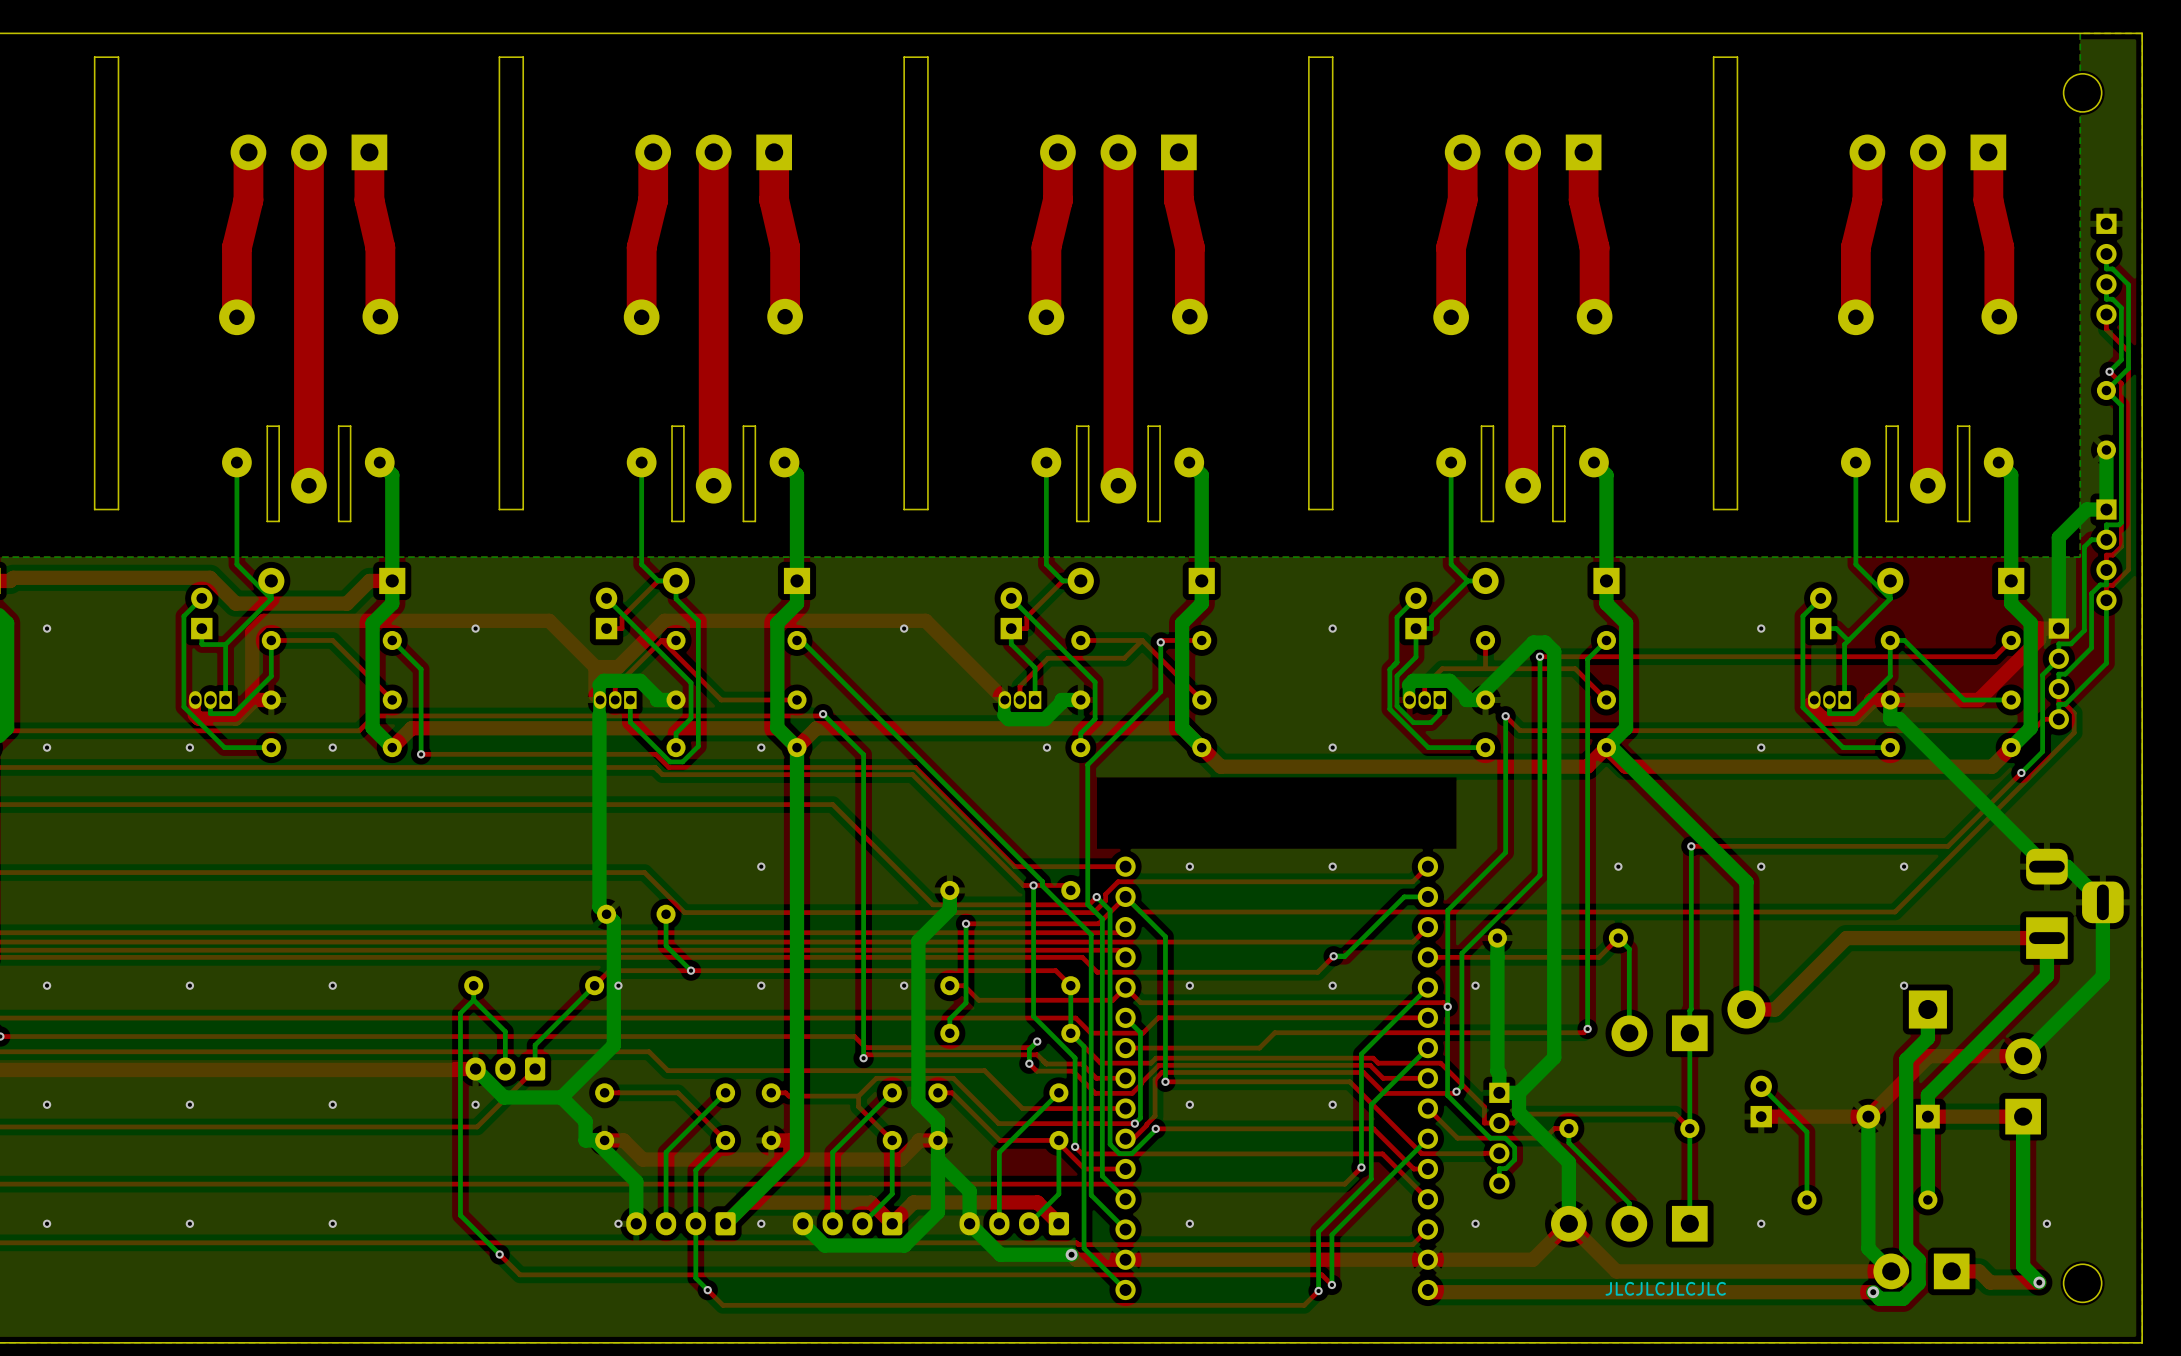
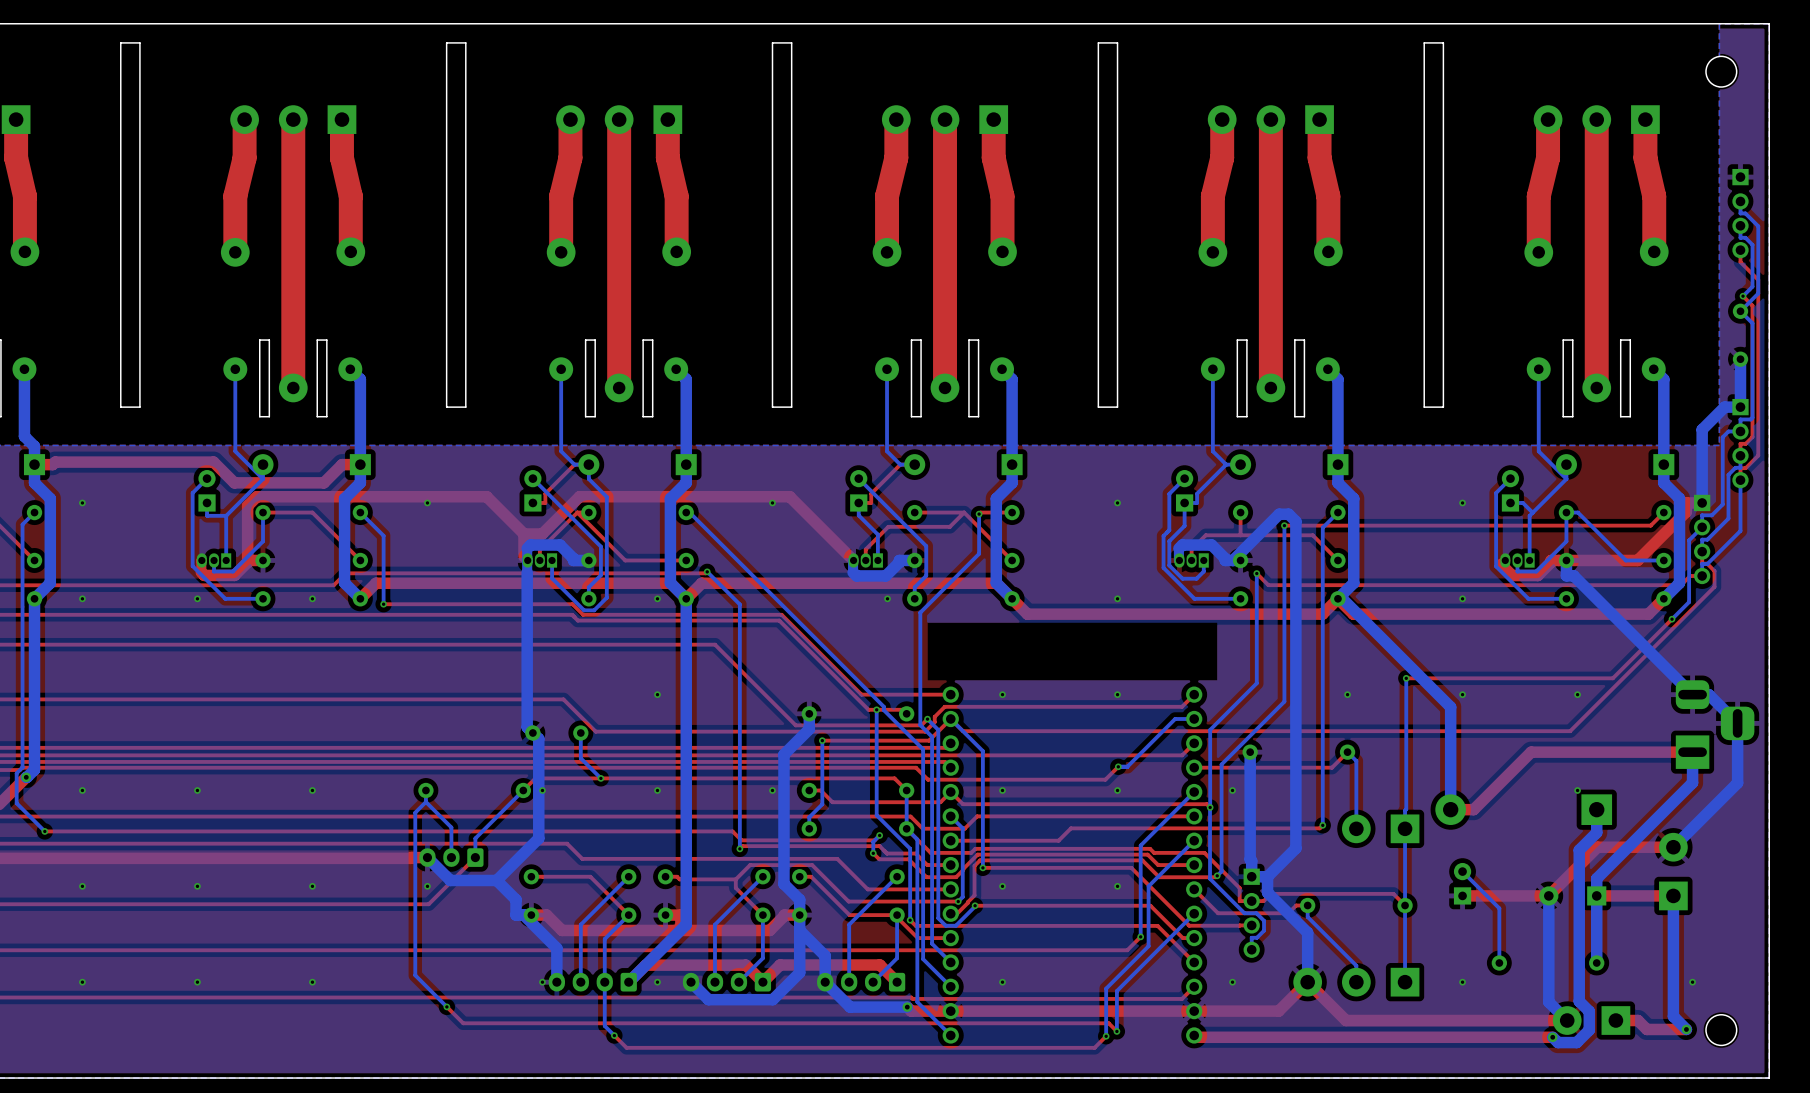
text: JLCJLCJLCJLC (1665, 1288) -> none

